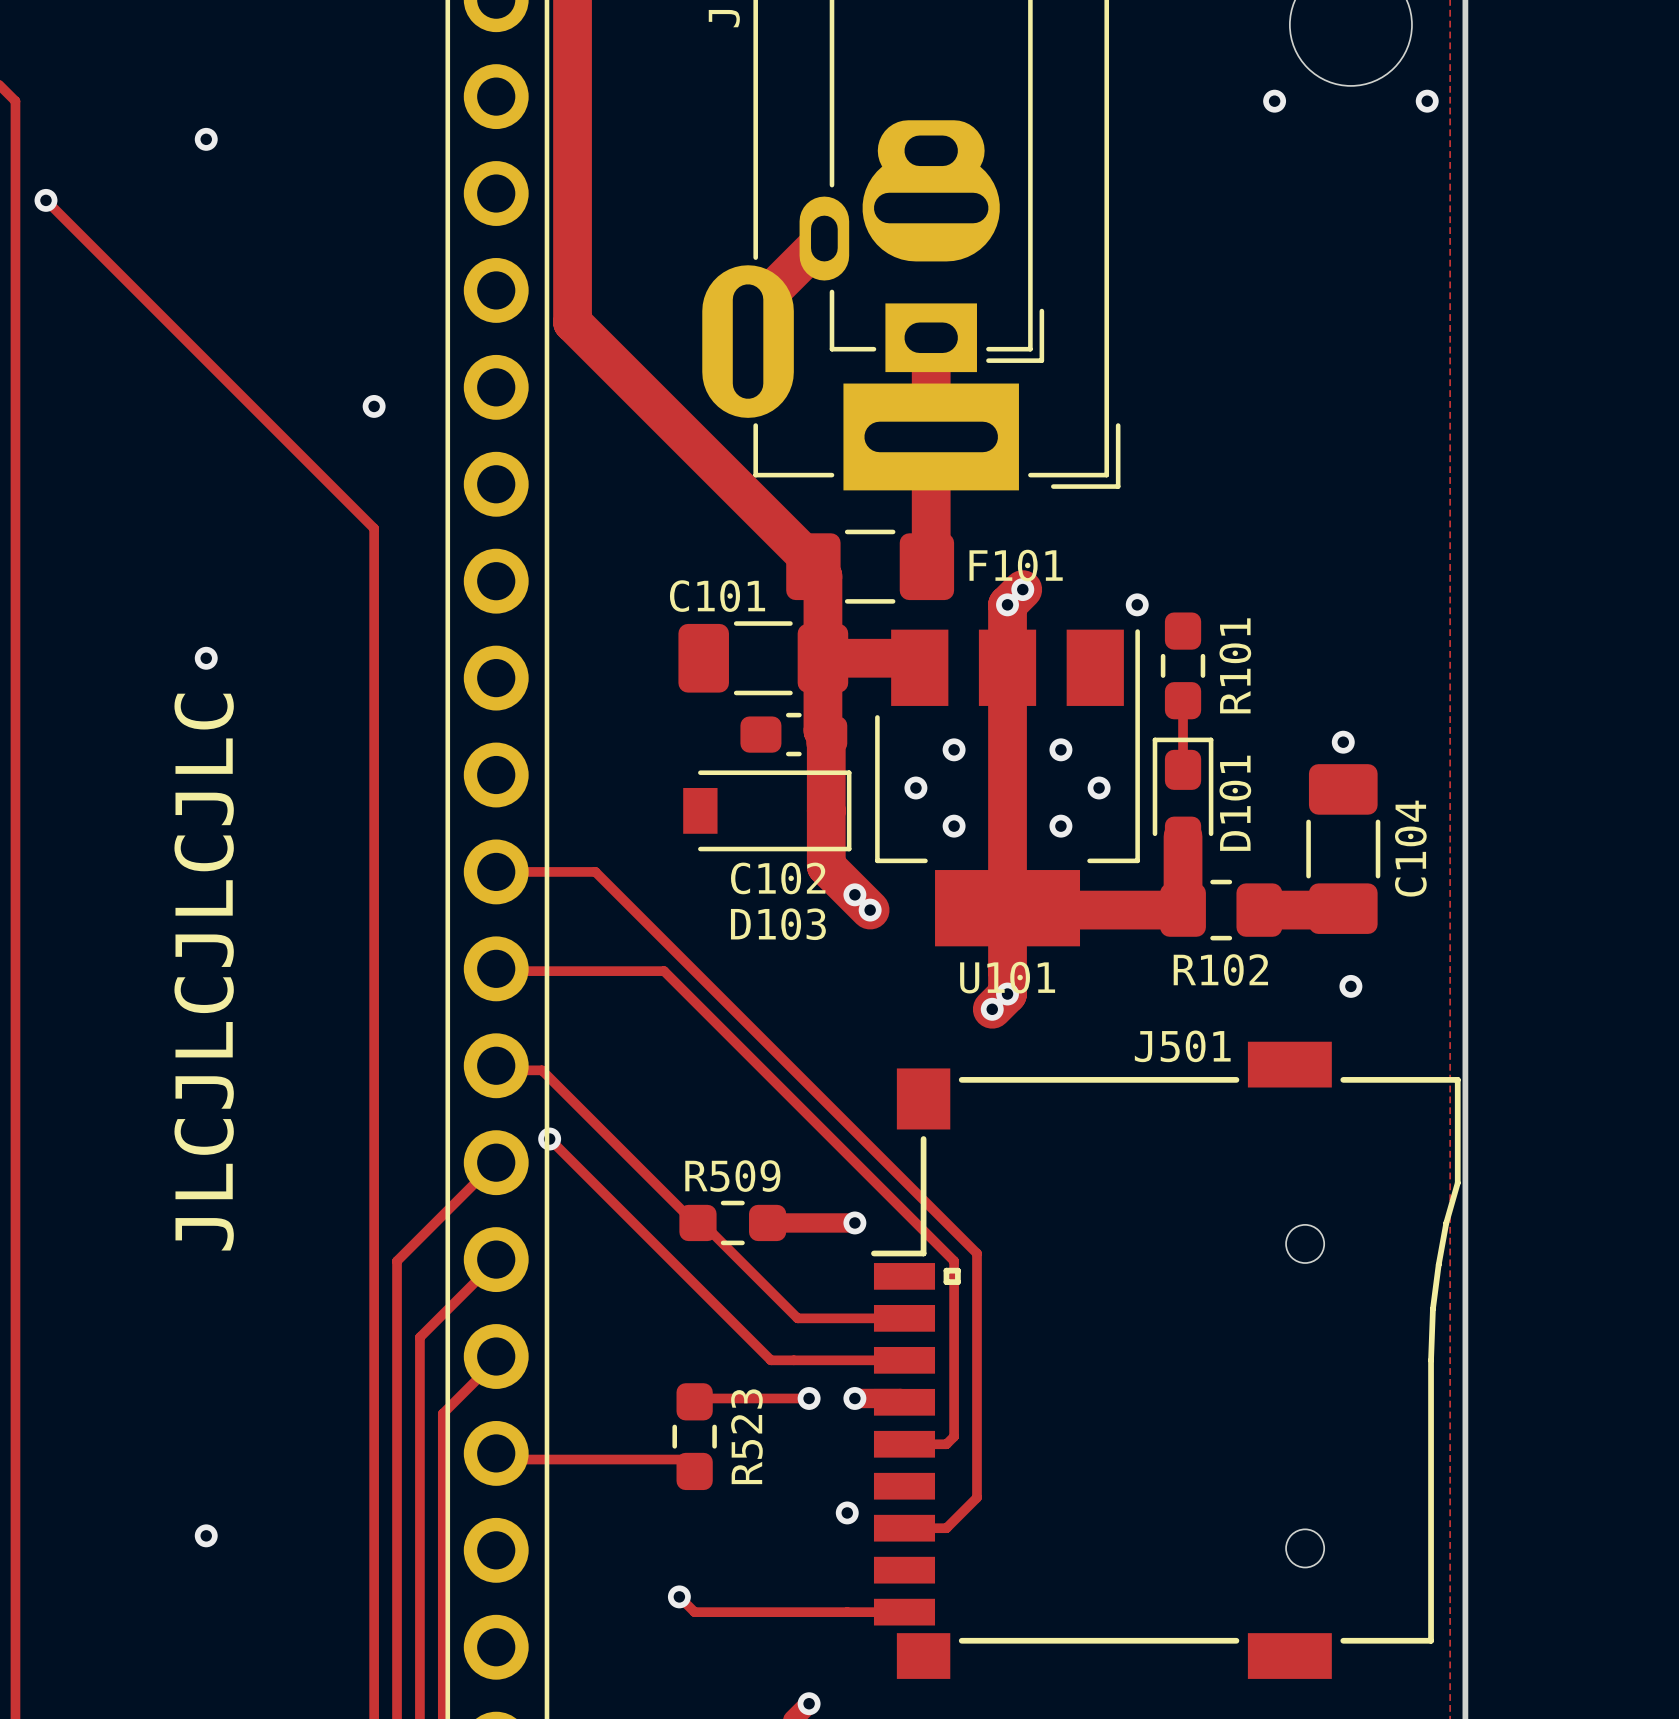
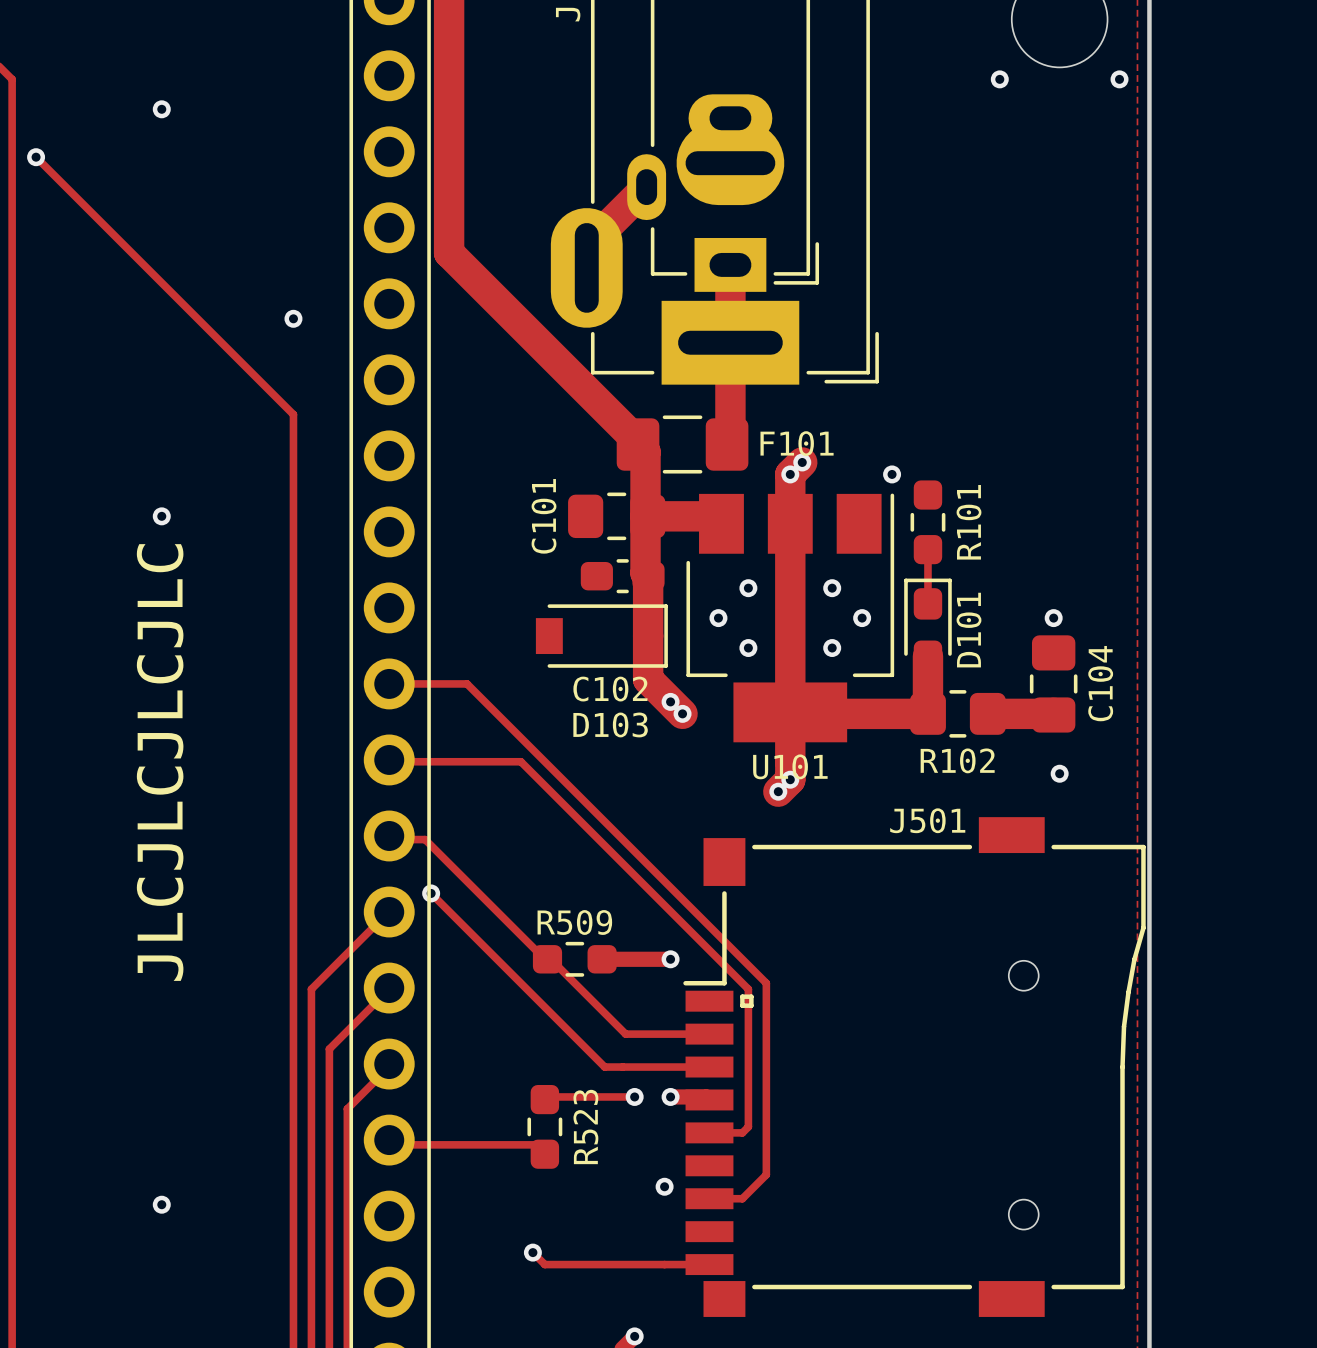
C101 footprint: [678, 621, 849, 696] -> [568, 492, 666, 541]
via position: (1343, 742) -> (1053, 618)
C104 footprint: [1306, 764, 1381, 934] -> [1029, 635, 1078, 733]

